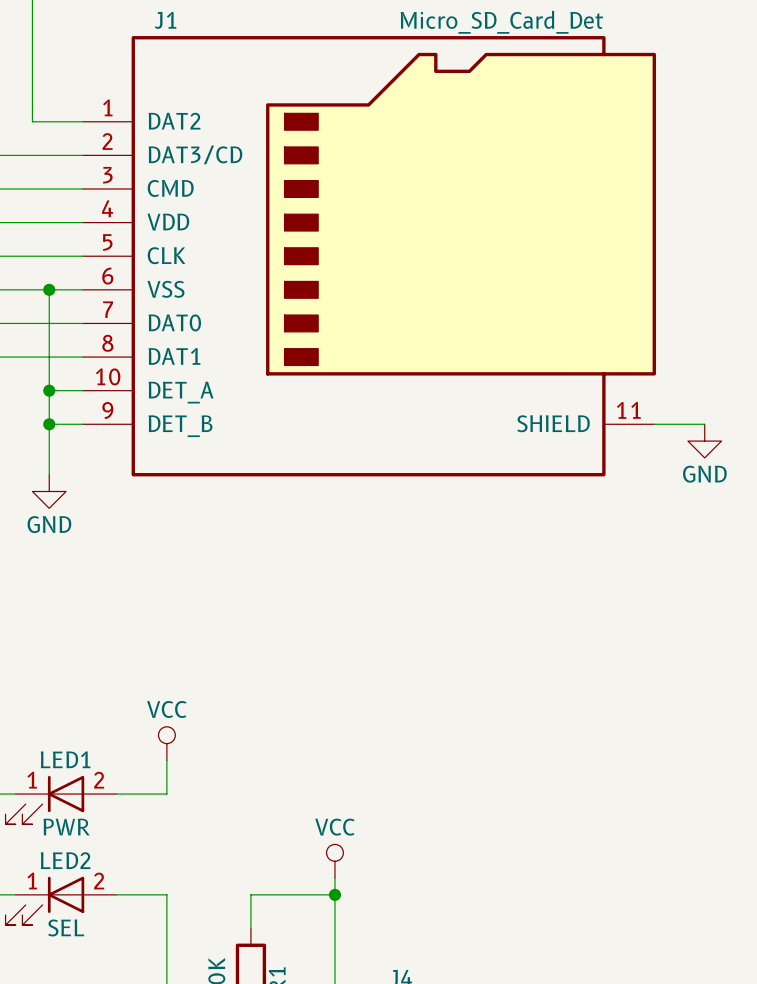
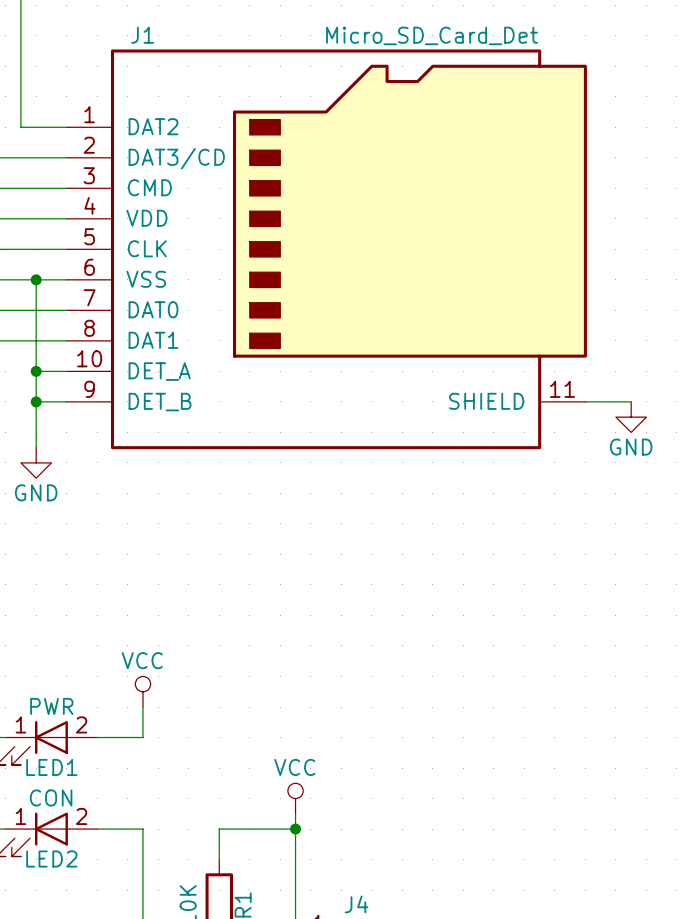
LED1 name: LED1 (65, 759) -> PWR (51, 706)
LED1 value: PWR (66, 827) -> LED1 (51, 767)
LED2 name: LED2 (65, 860) -> CON (51, 797)
LED2 value: SEL (66, 927) -> LED2 (51, 858)

